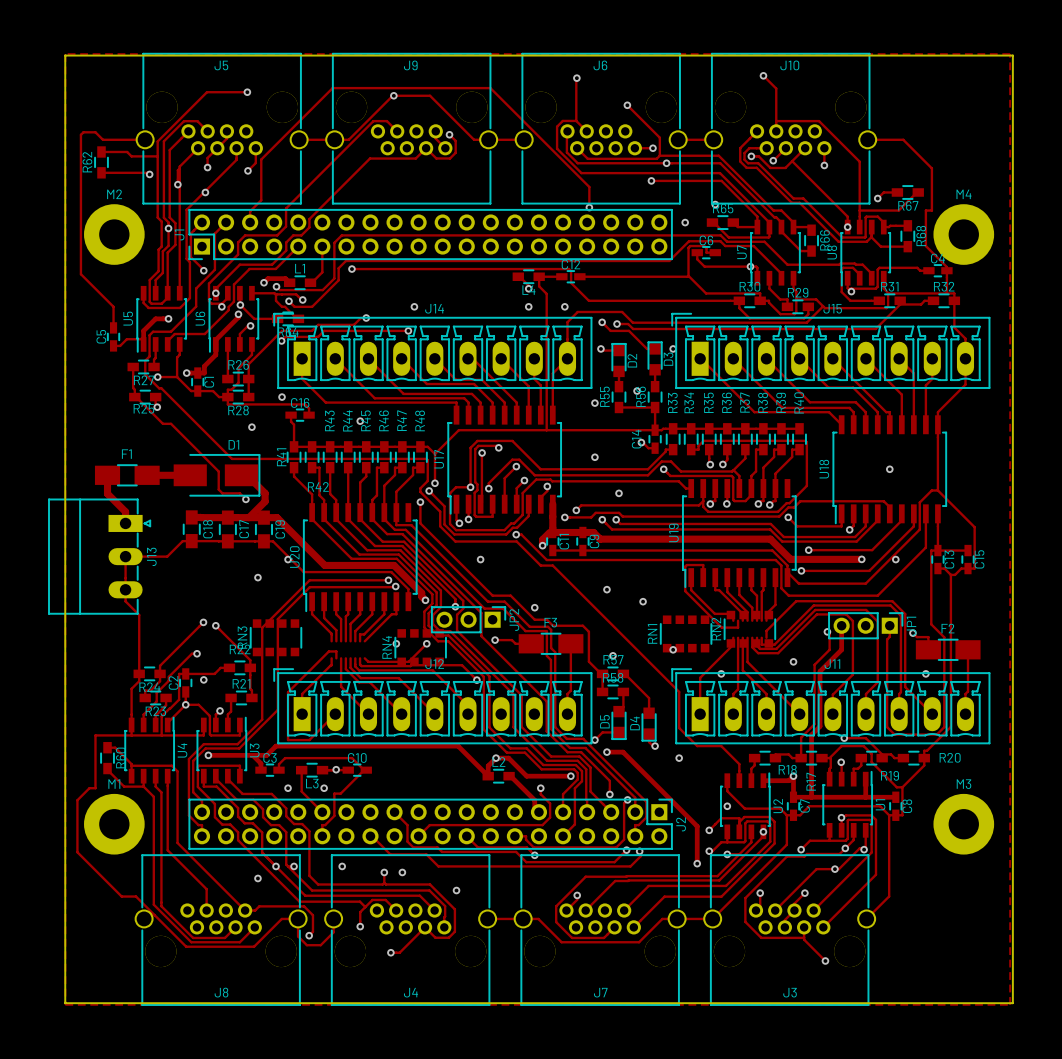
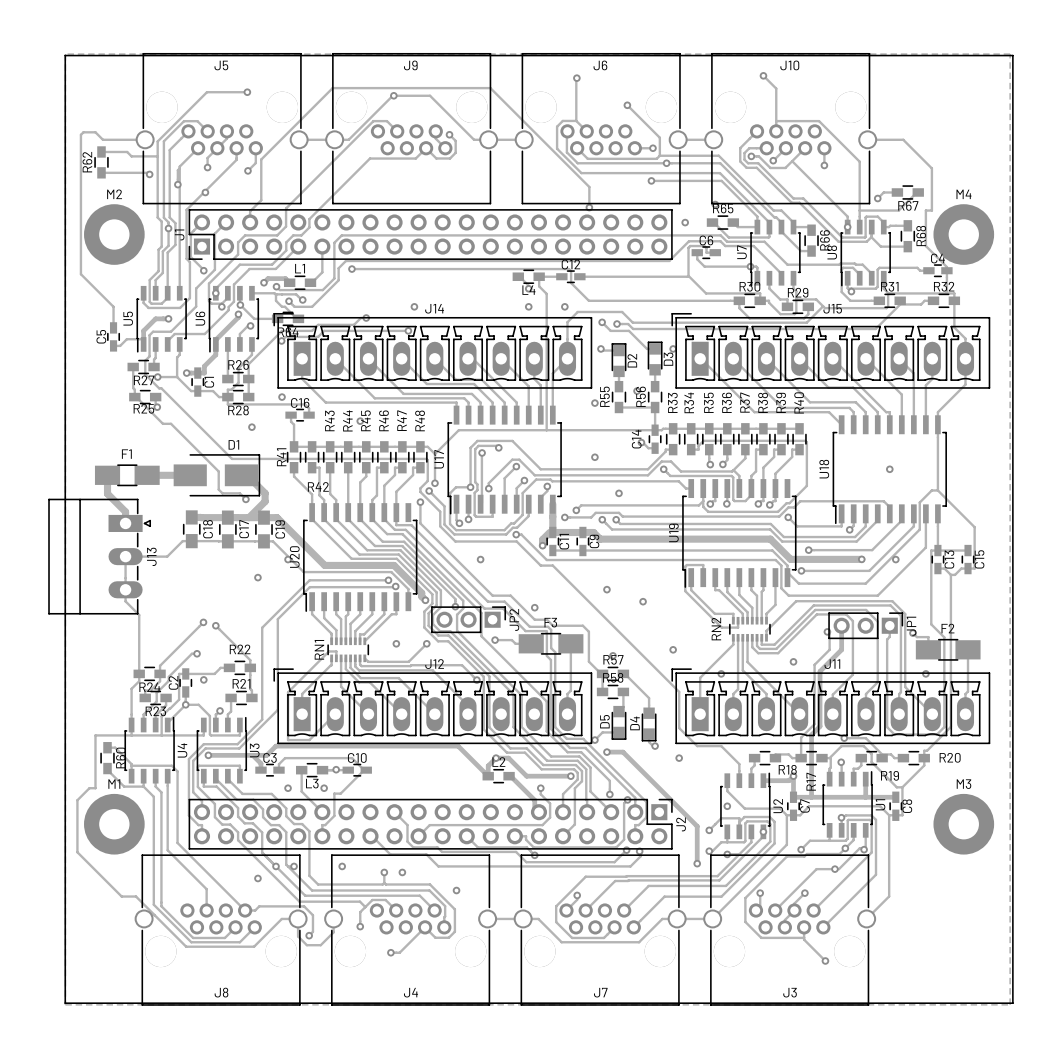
RN2 footprint: [724, 610, 776, 648] -> [729, 616, 771, 642]
RN1 footprint: [660, 615, 712, 653] -> [327, 637, 369, 663]
RN3: (276, 637) -> none
RN4: (420, 647) -> none

